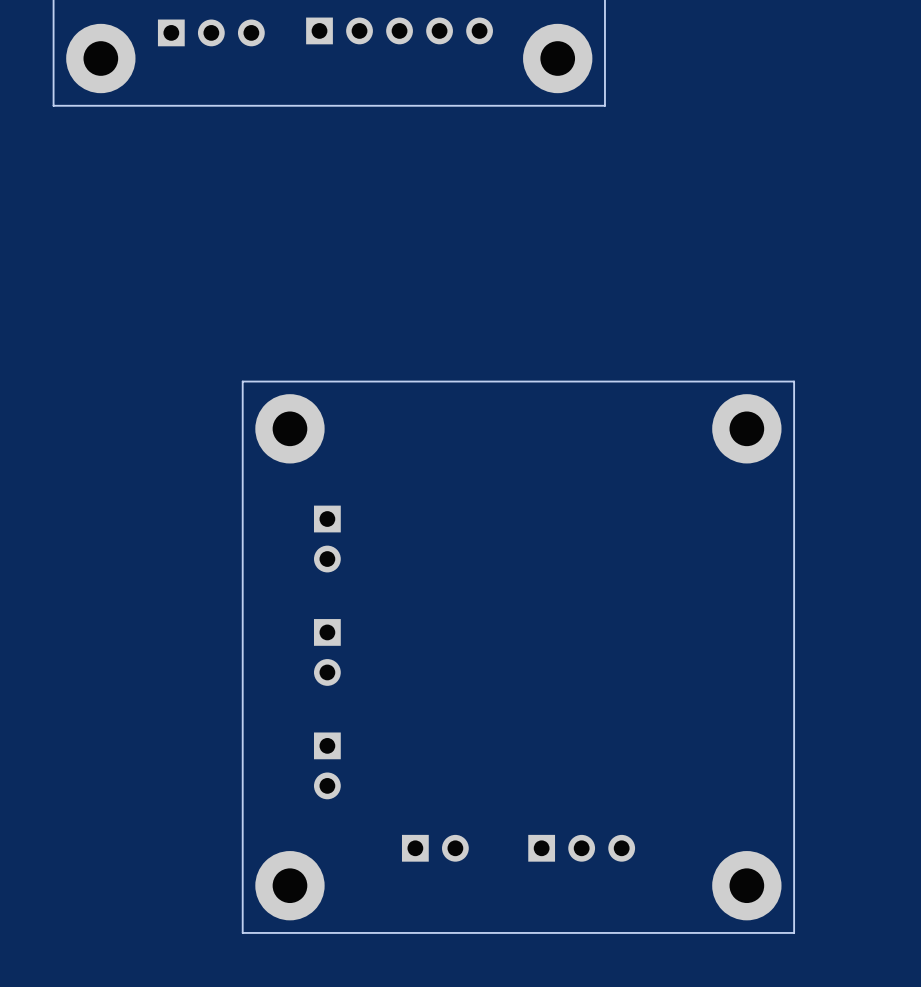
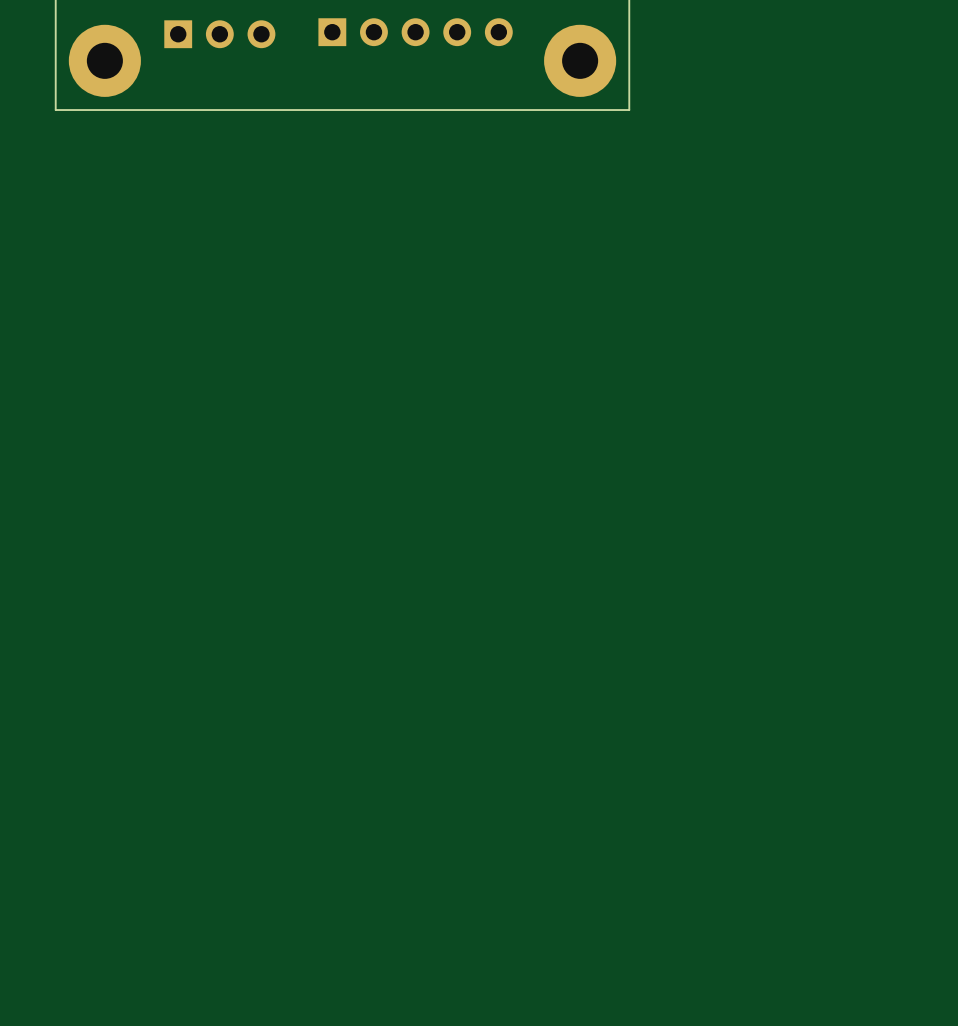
board edge: (794, 381) (242, 381) (242, 932) (794, 932) (794, 381) -> none
part: (289, 428) -> none
part: (746, 428) -> none
part: (327, 539) -> none
part: (327, 652) -> none
part: (327, 765) -> none
part: (435, 848) -> none
part: (581, 848) -> none
part: (289, 885) -> none
part: (746, 885) -> none

